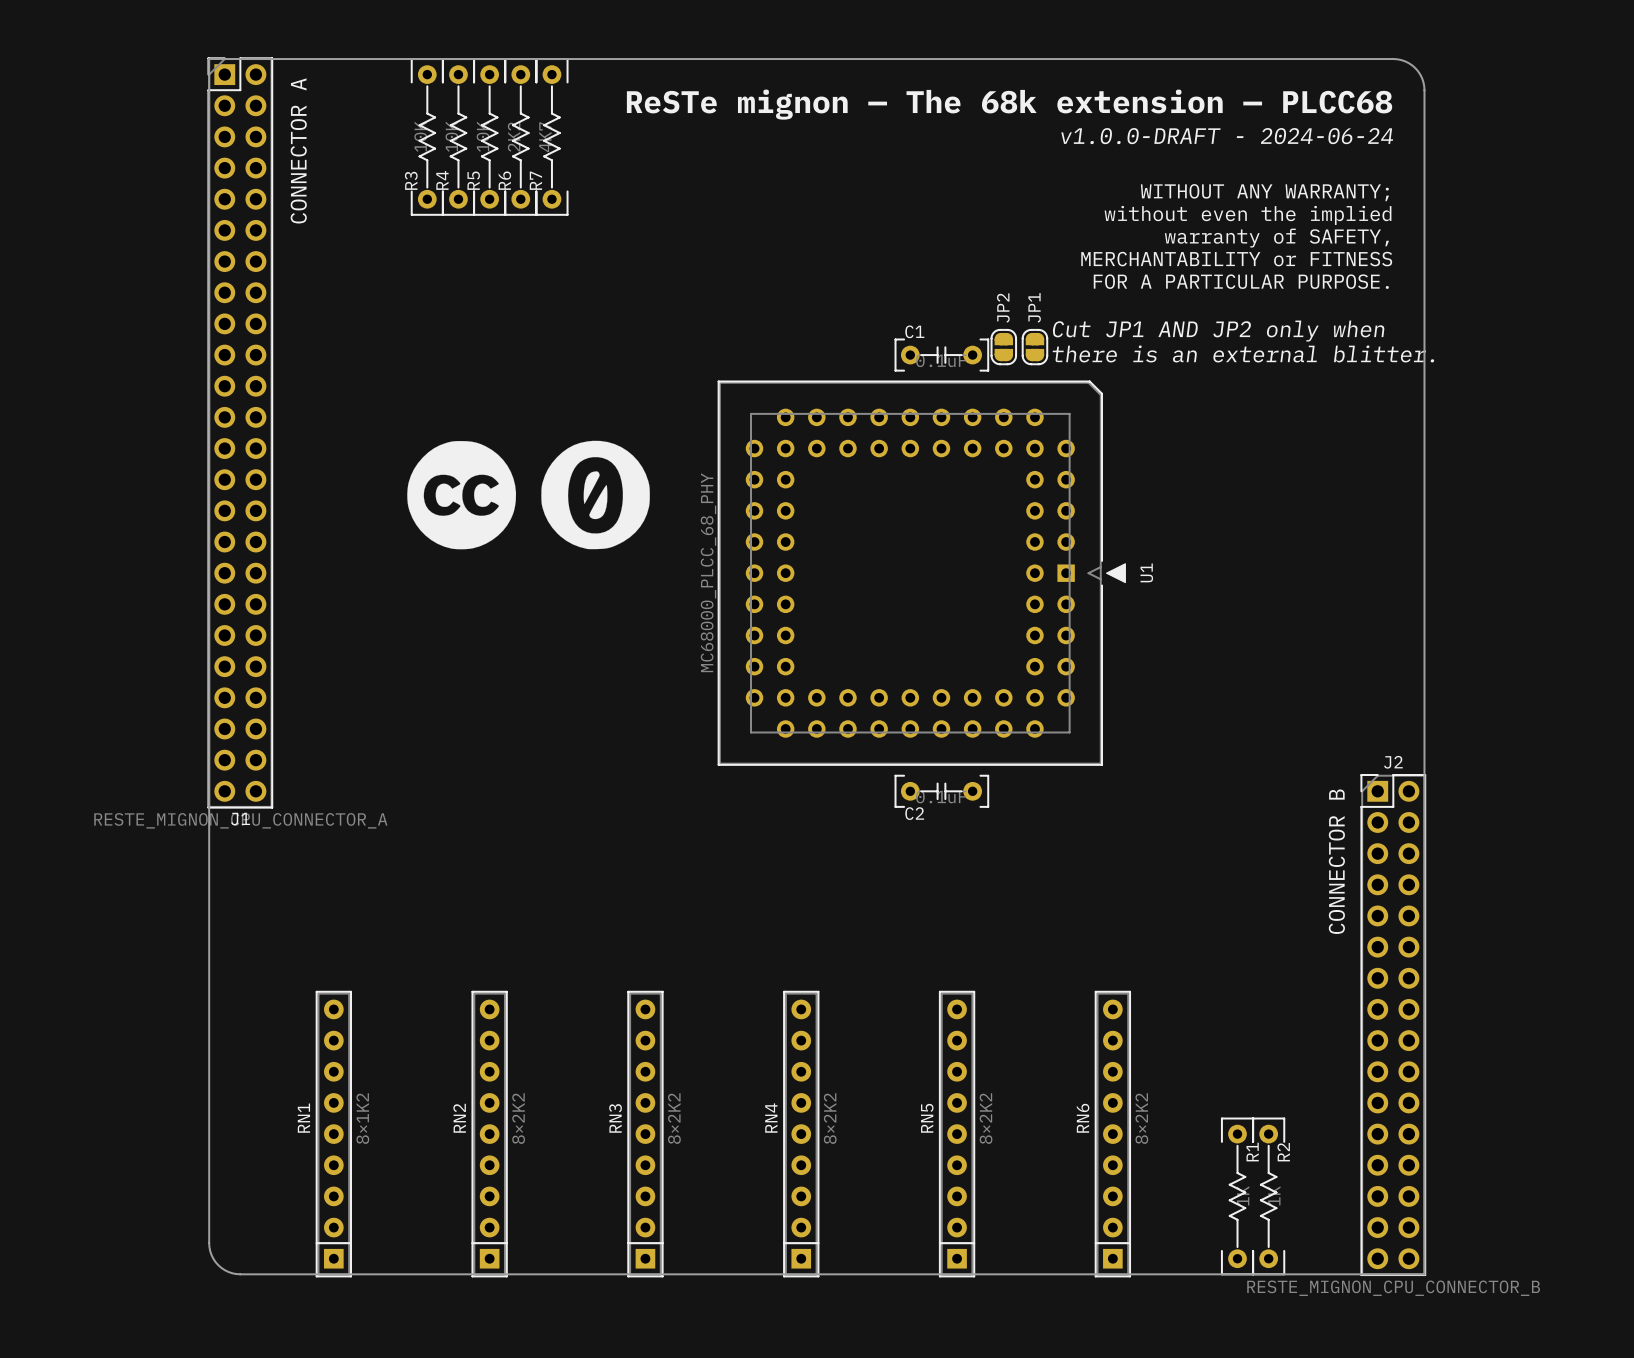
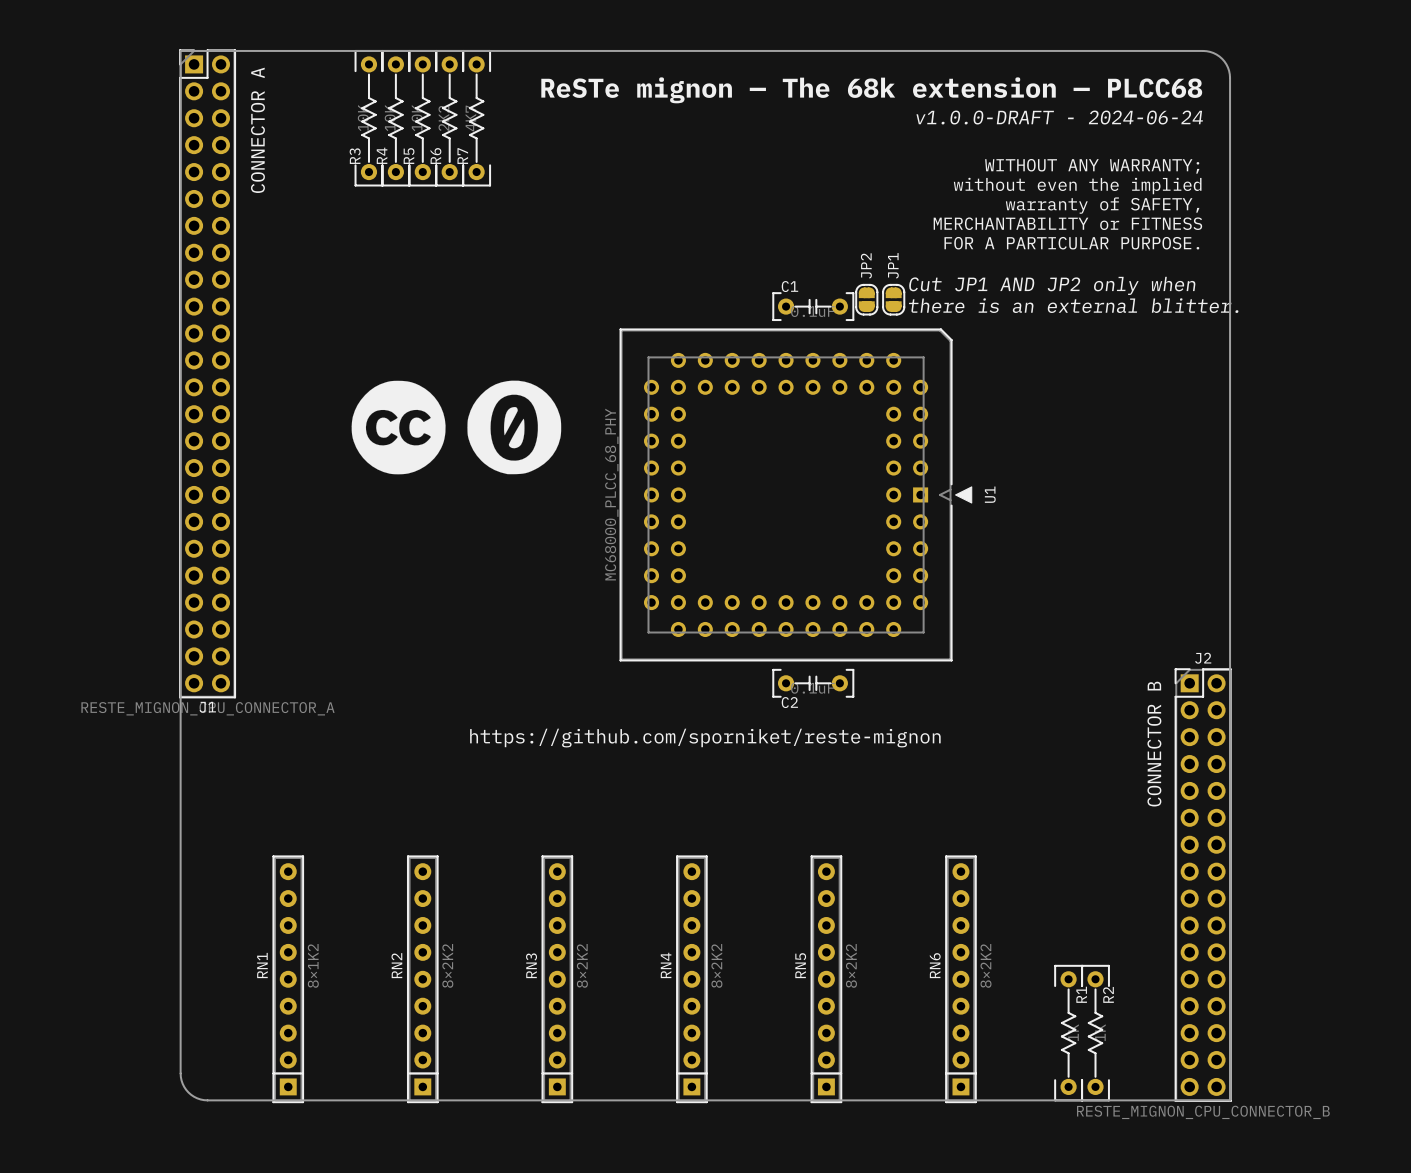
text: none -> https://github.com/sporniket/reste-mignon (705, 738)

